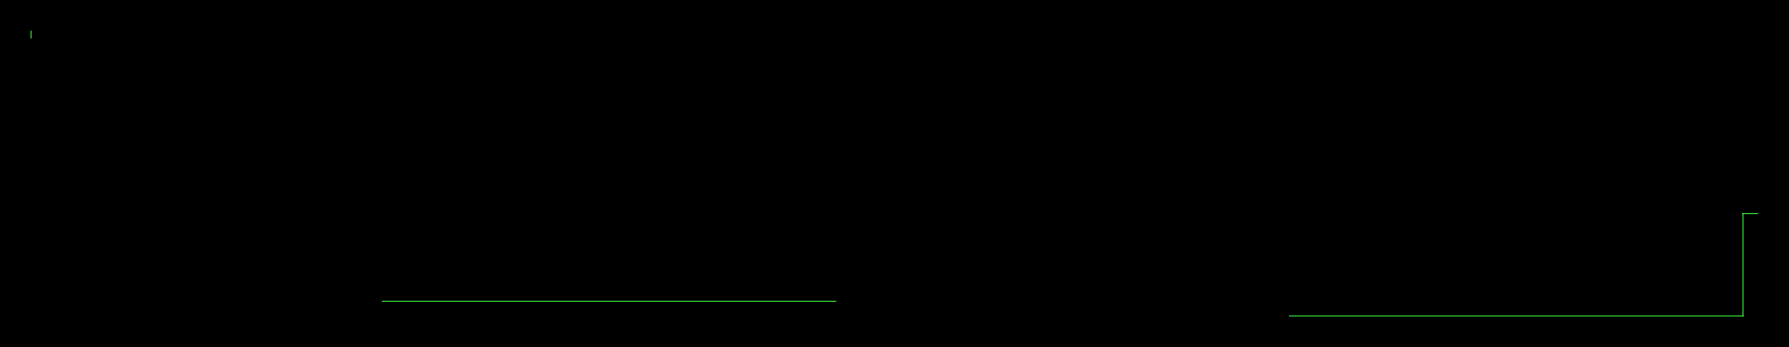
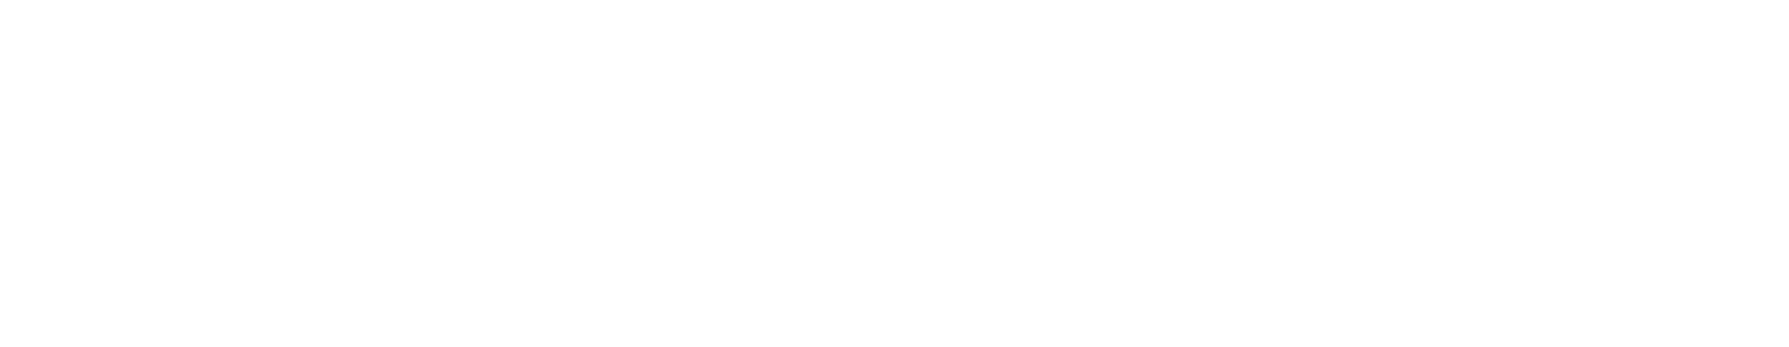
wire: (31, 31) (31, 37) -> none
wire: (1757, 213) (1742, 213) (1742, 315) (1289, 315) -> none
wire: (382, 301) (835, 301) -> none

